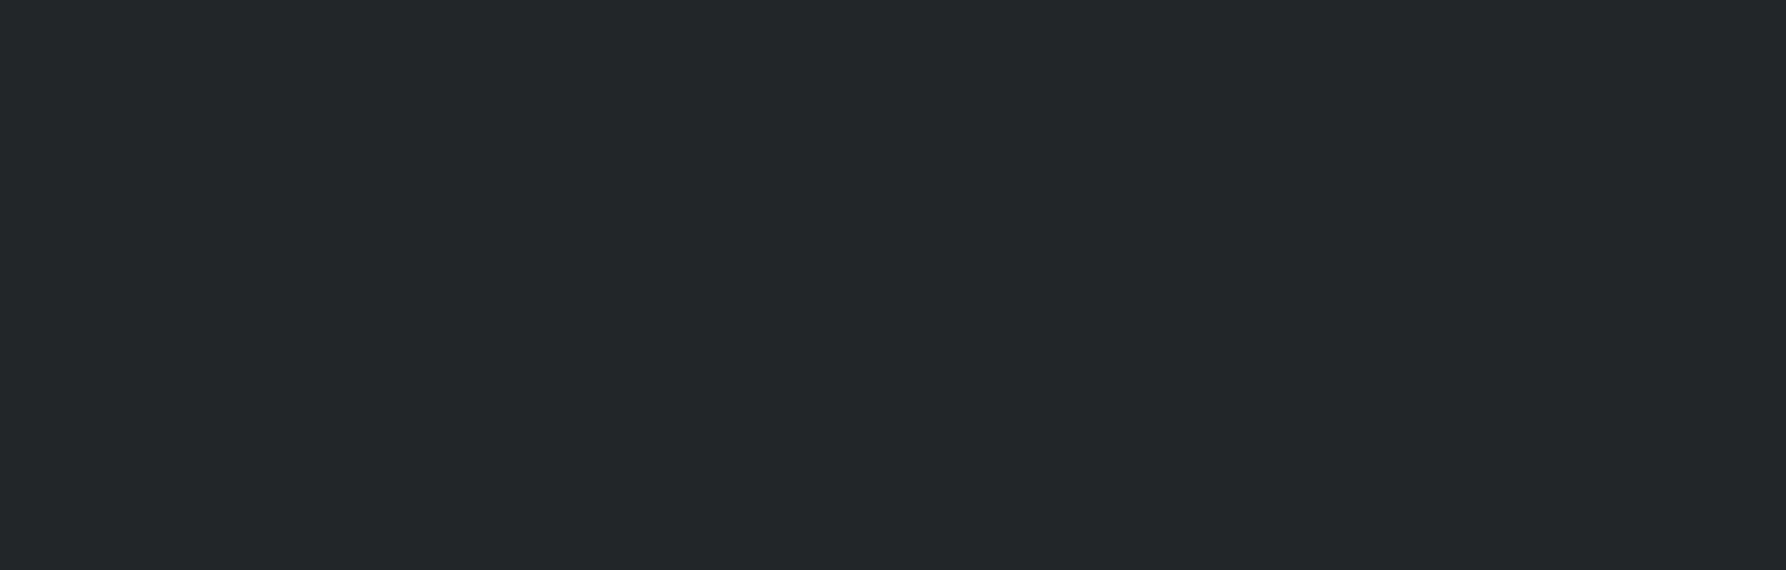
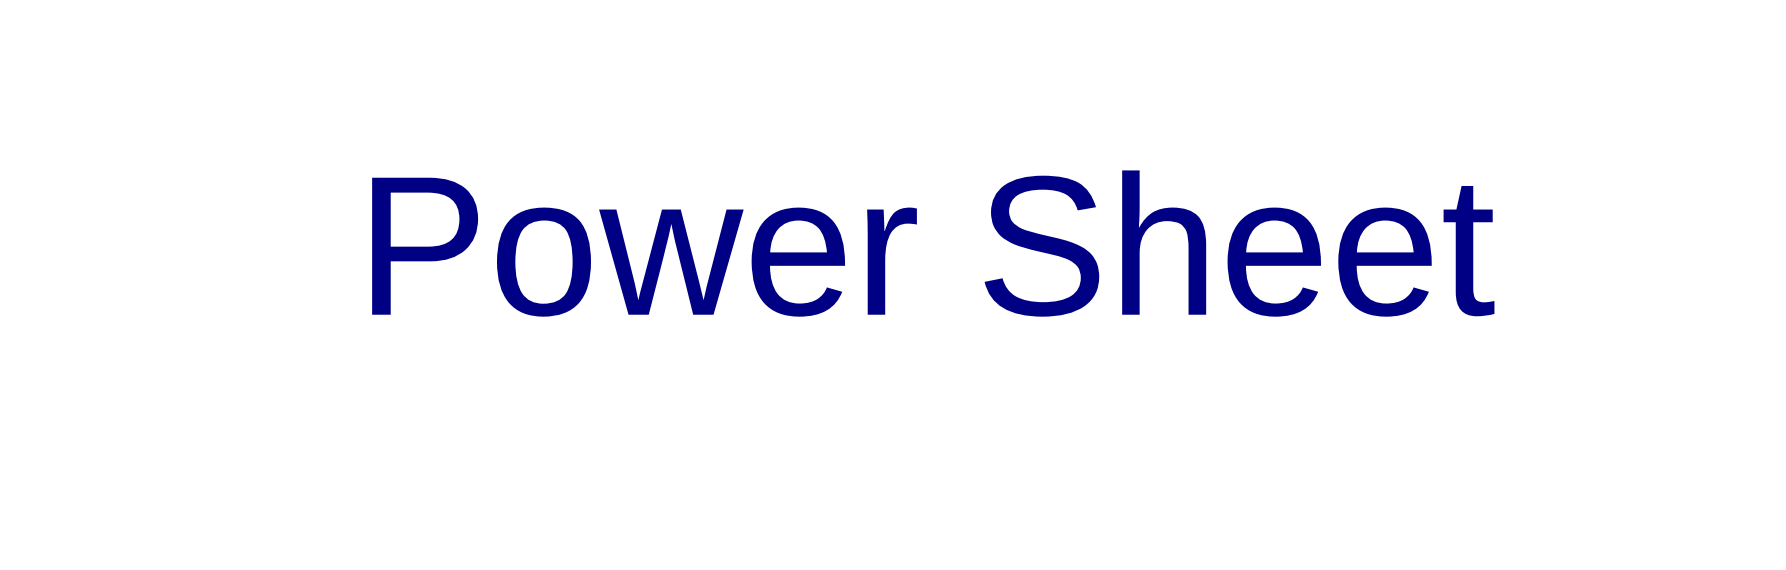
text: none -> Power Sheet (933, 243)

